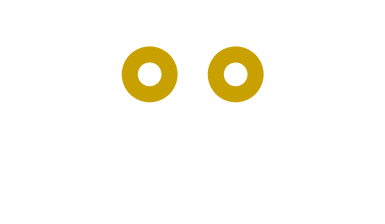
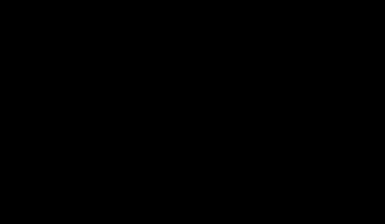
part: (192, 74) -> none

